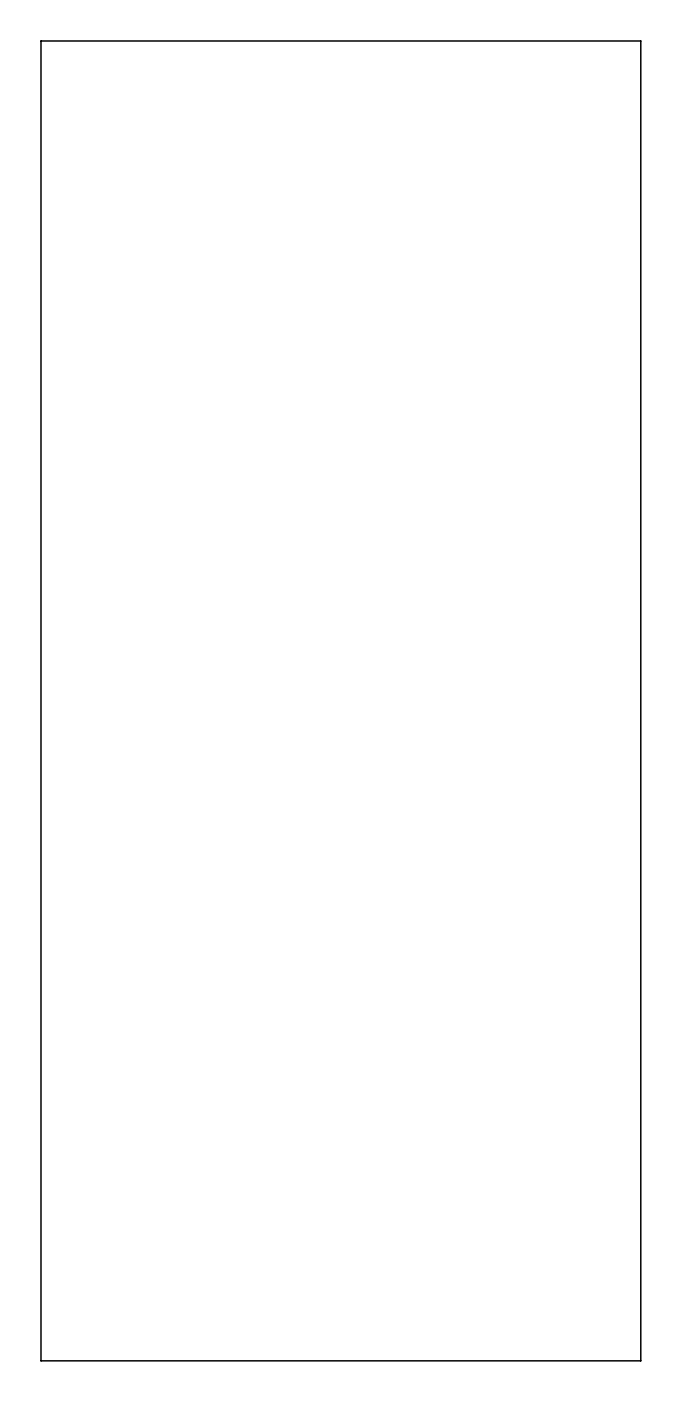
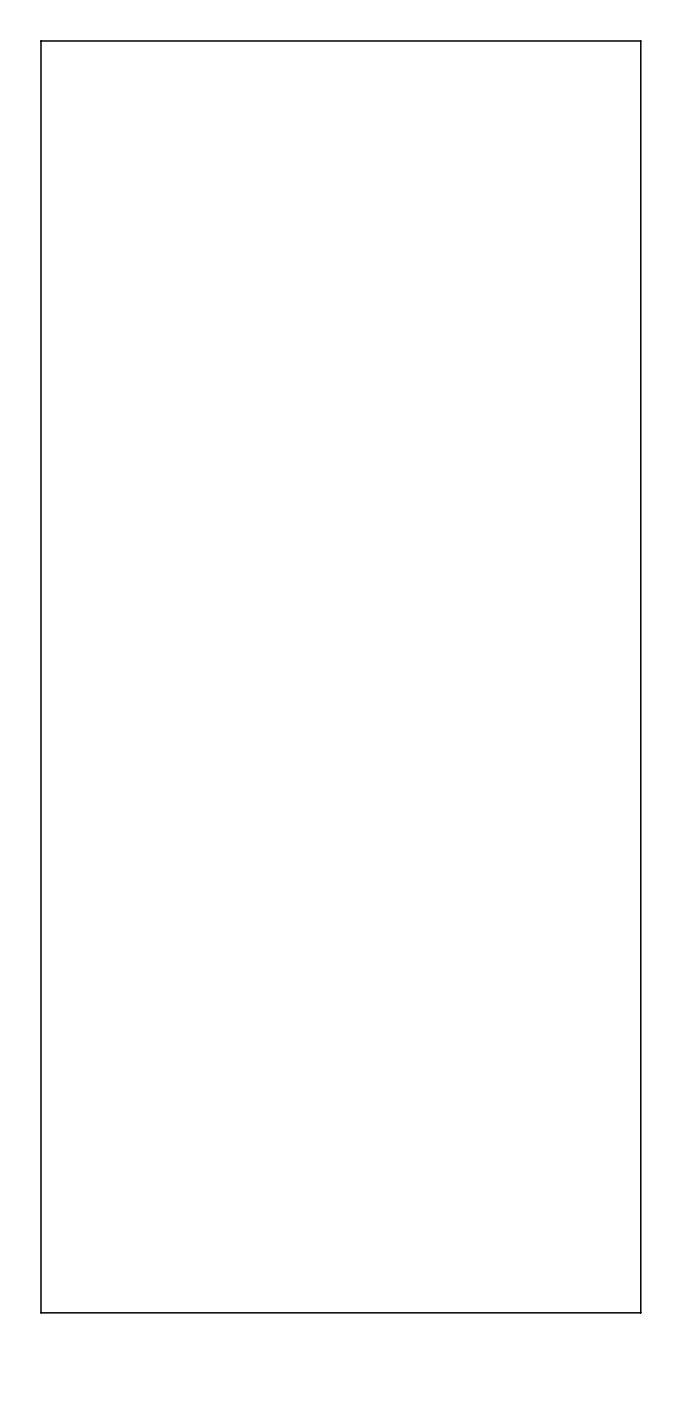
board edge: (40, 1312) (40, 1360) (640, 1360) (640, 1312) -> (40, 1312) (640, 1312)

